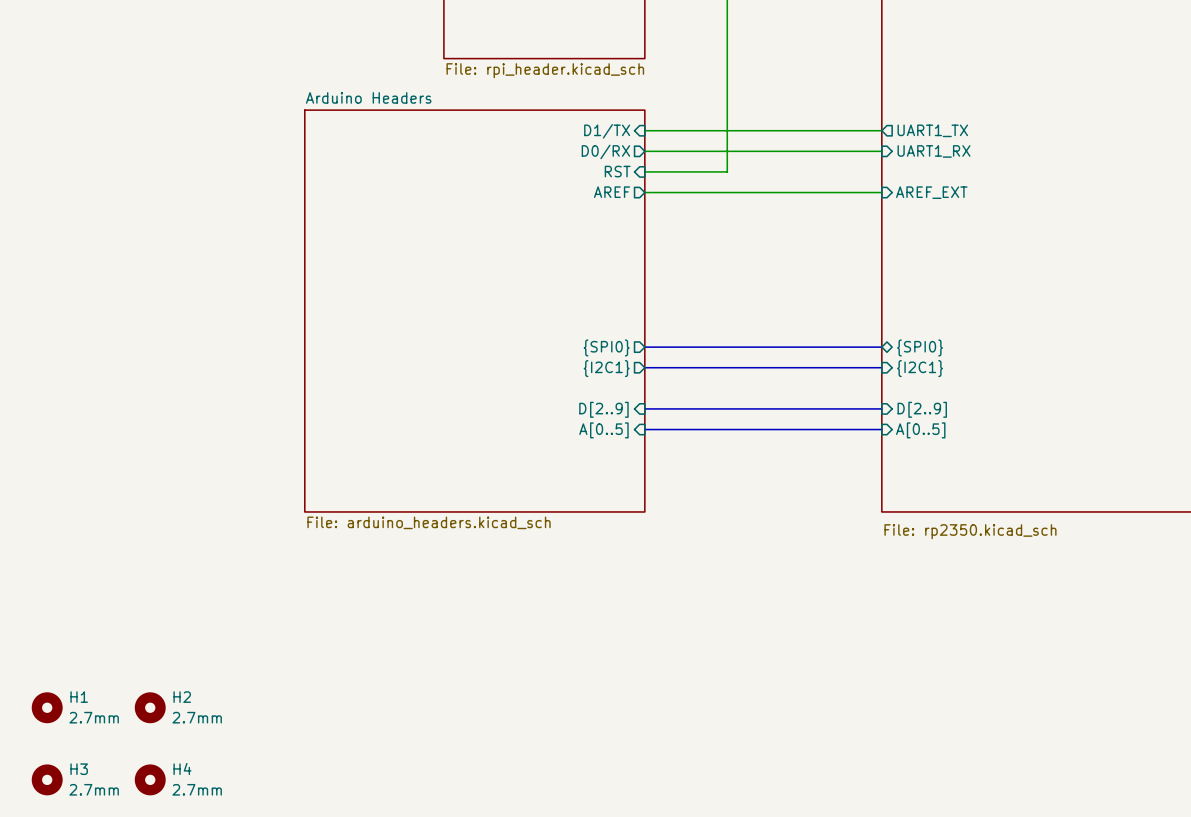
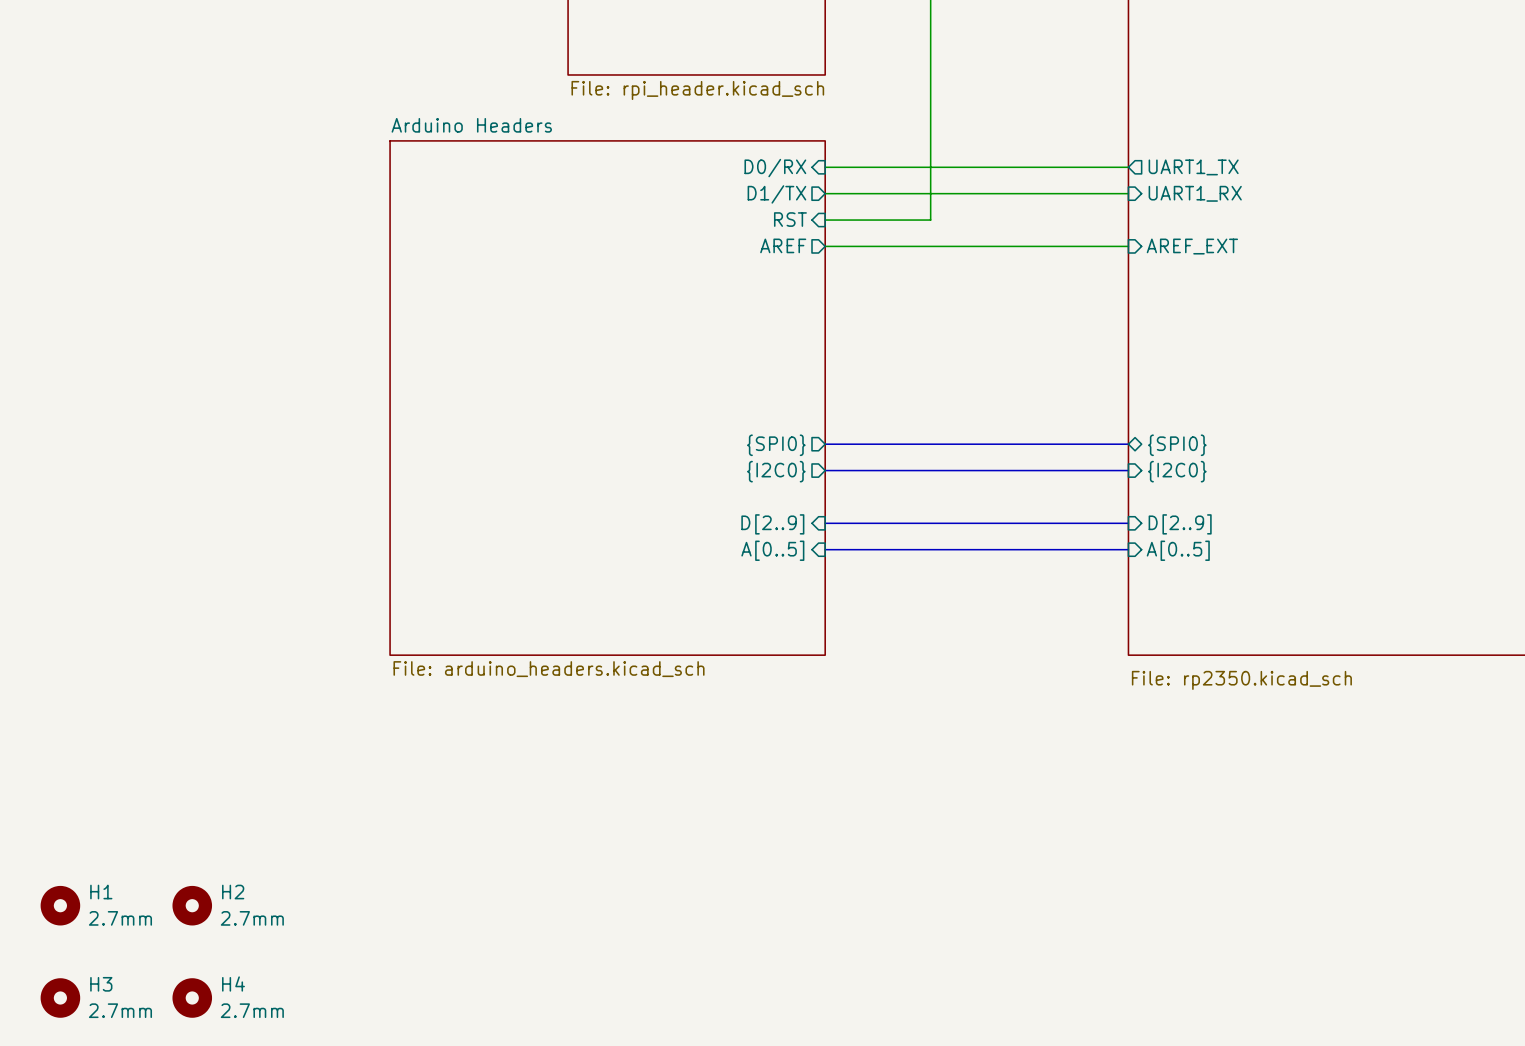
sheet pin: D1/TX (607, 131) -> D0/RX (775, 168)
sheet pin: D0/RX (605, 151) -> D1/TX (776, 194)
sheet pin: {I2C1} (606, 368) -> {I2C0} (776, 471)
sheet pin: {I2C1} (920, 368) -> {I2C0} (1177, 471)

